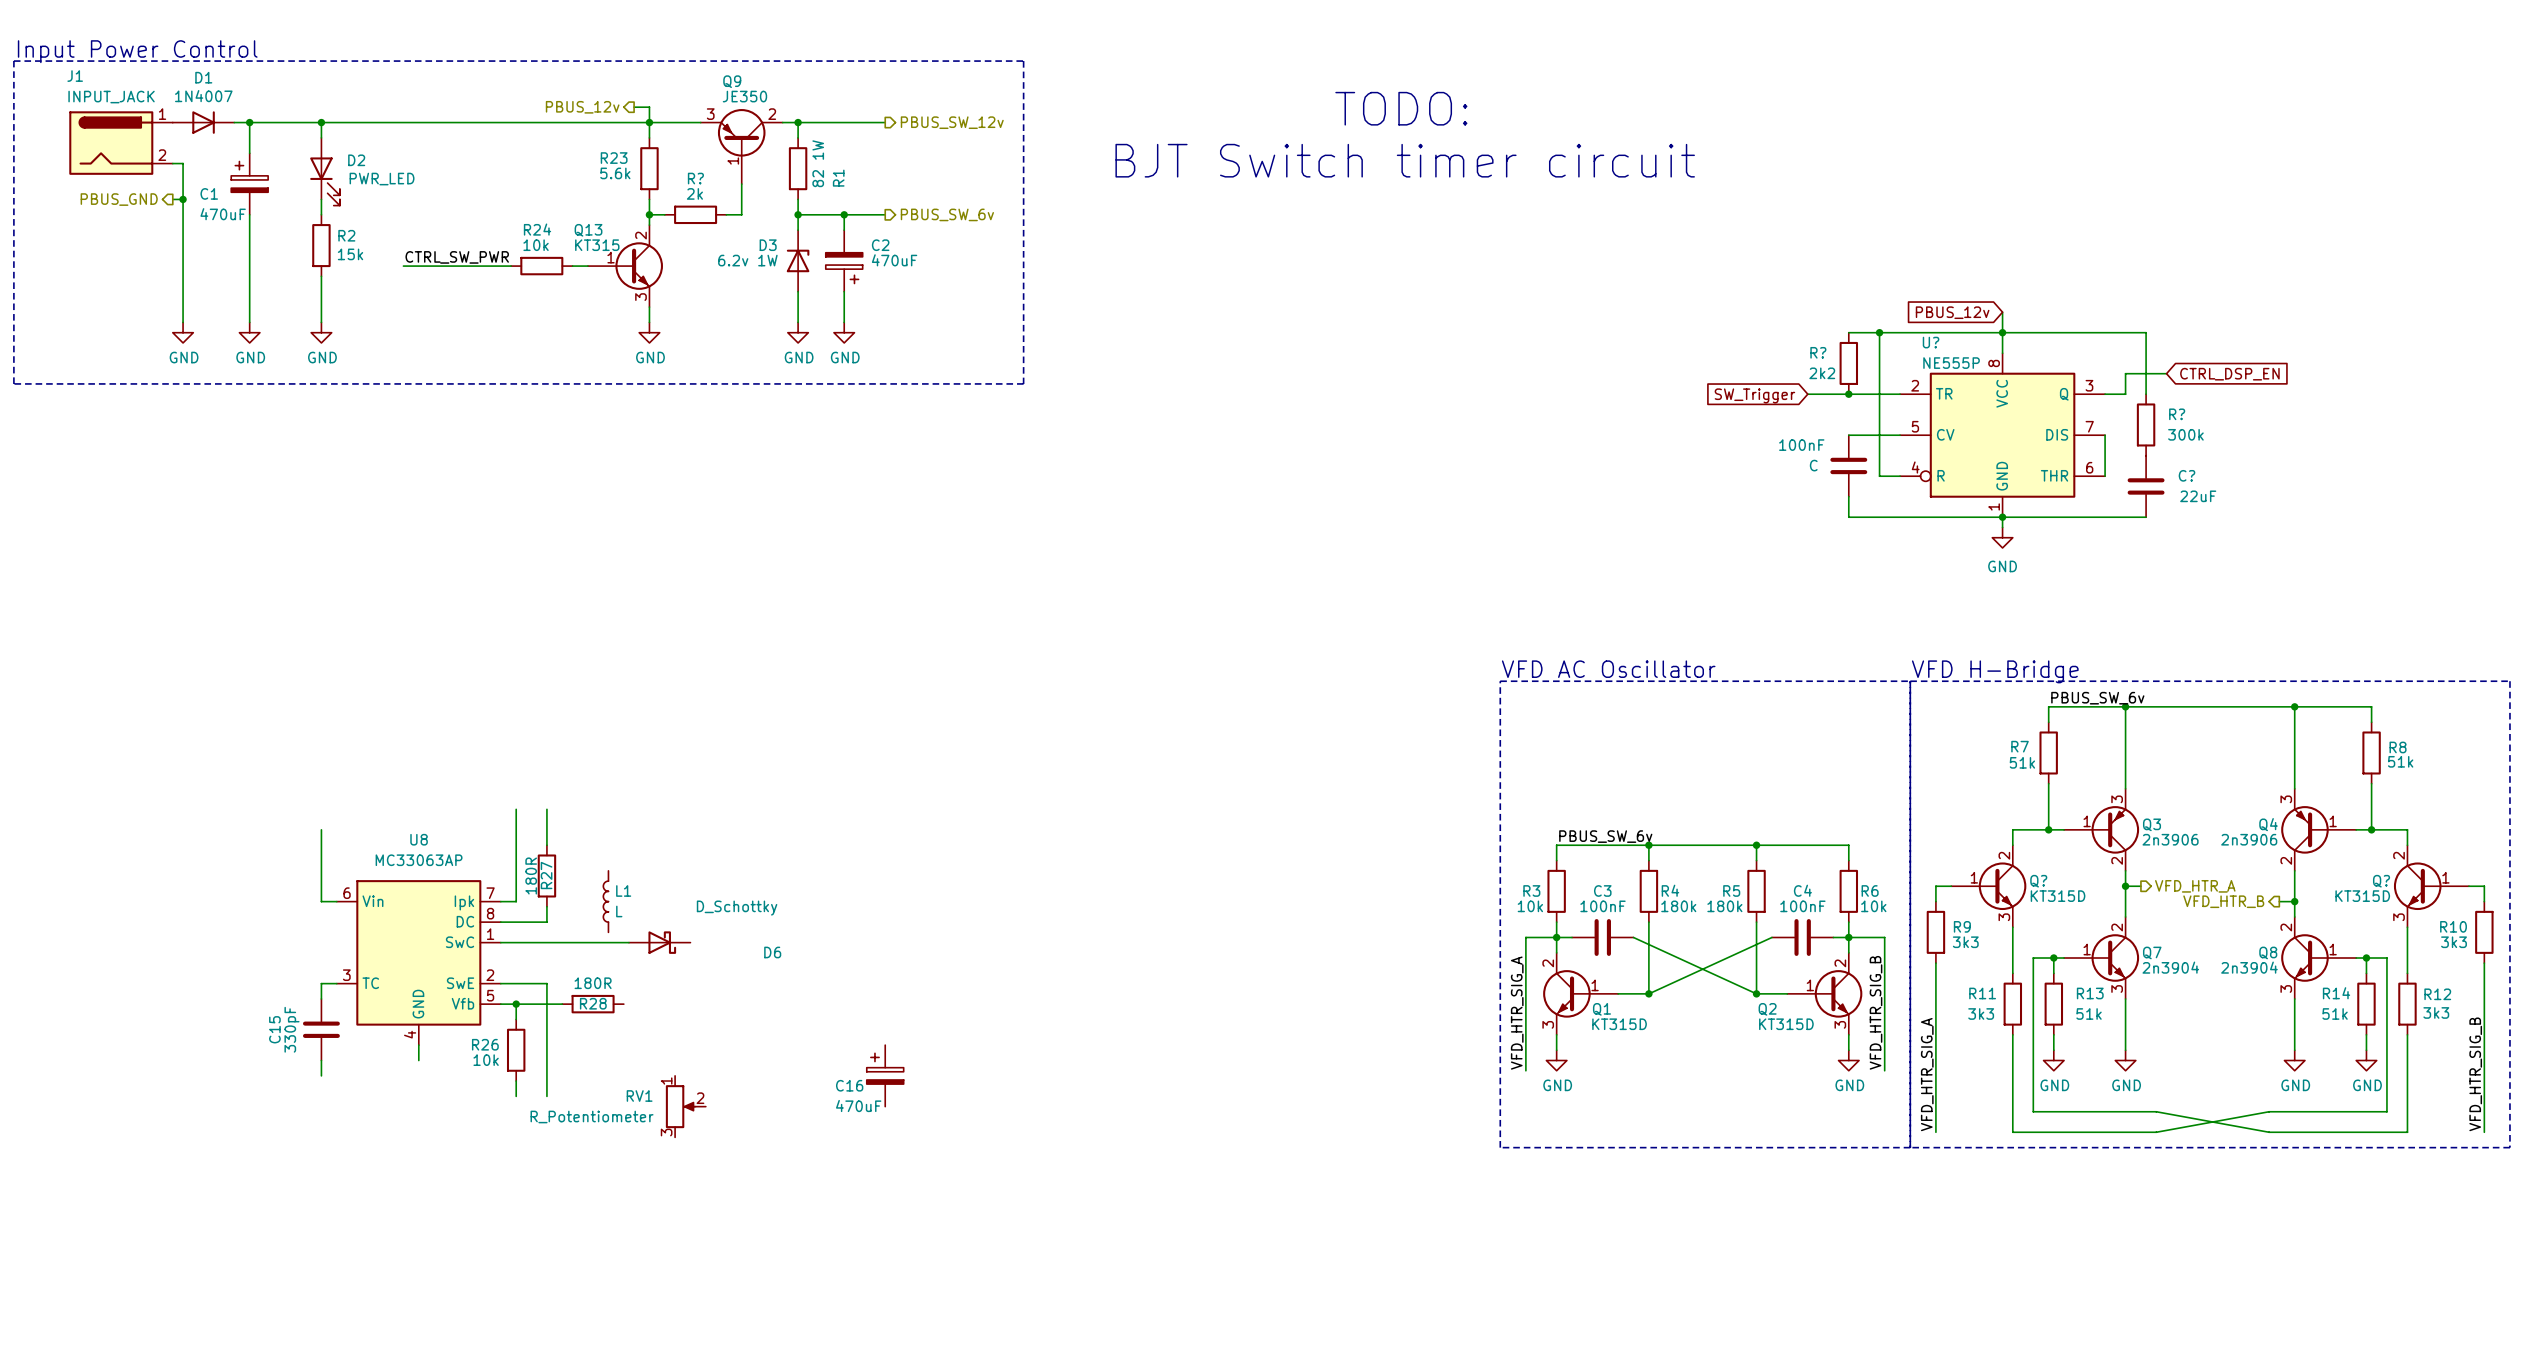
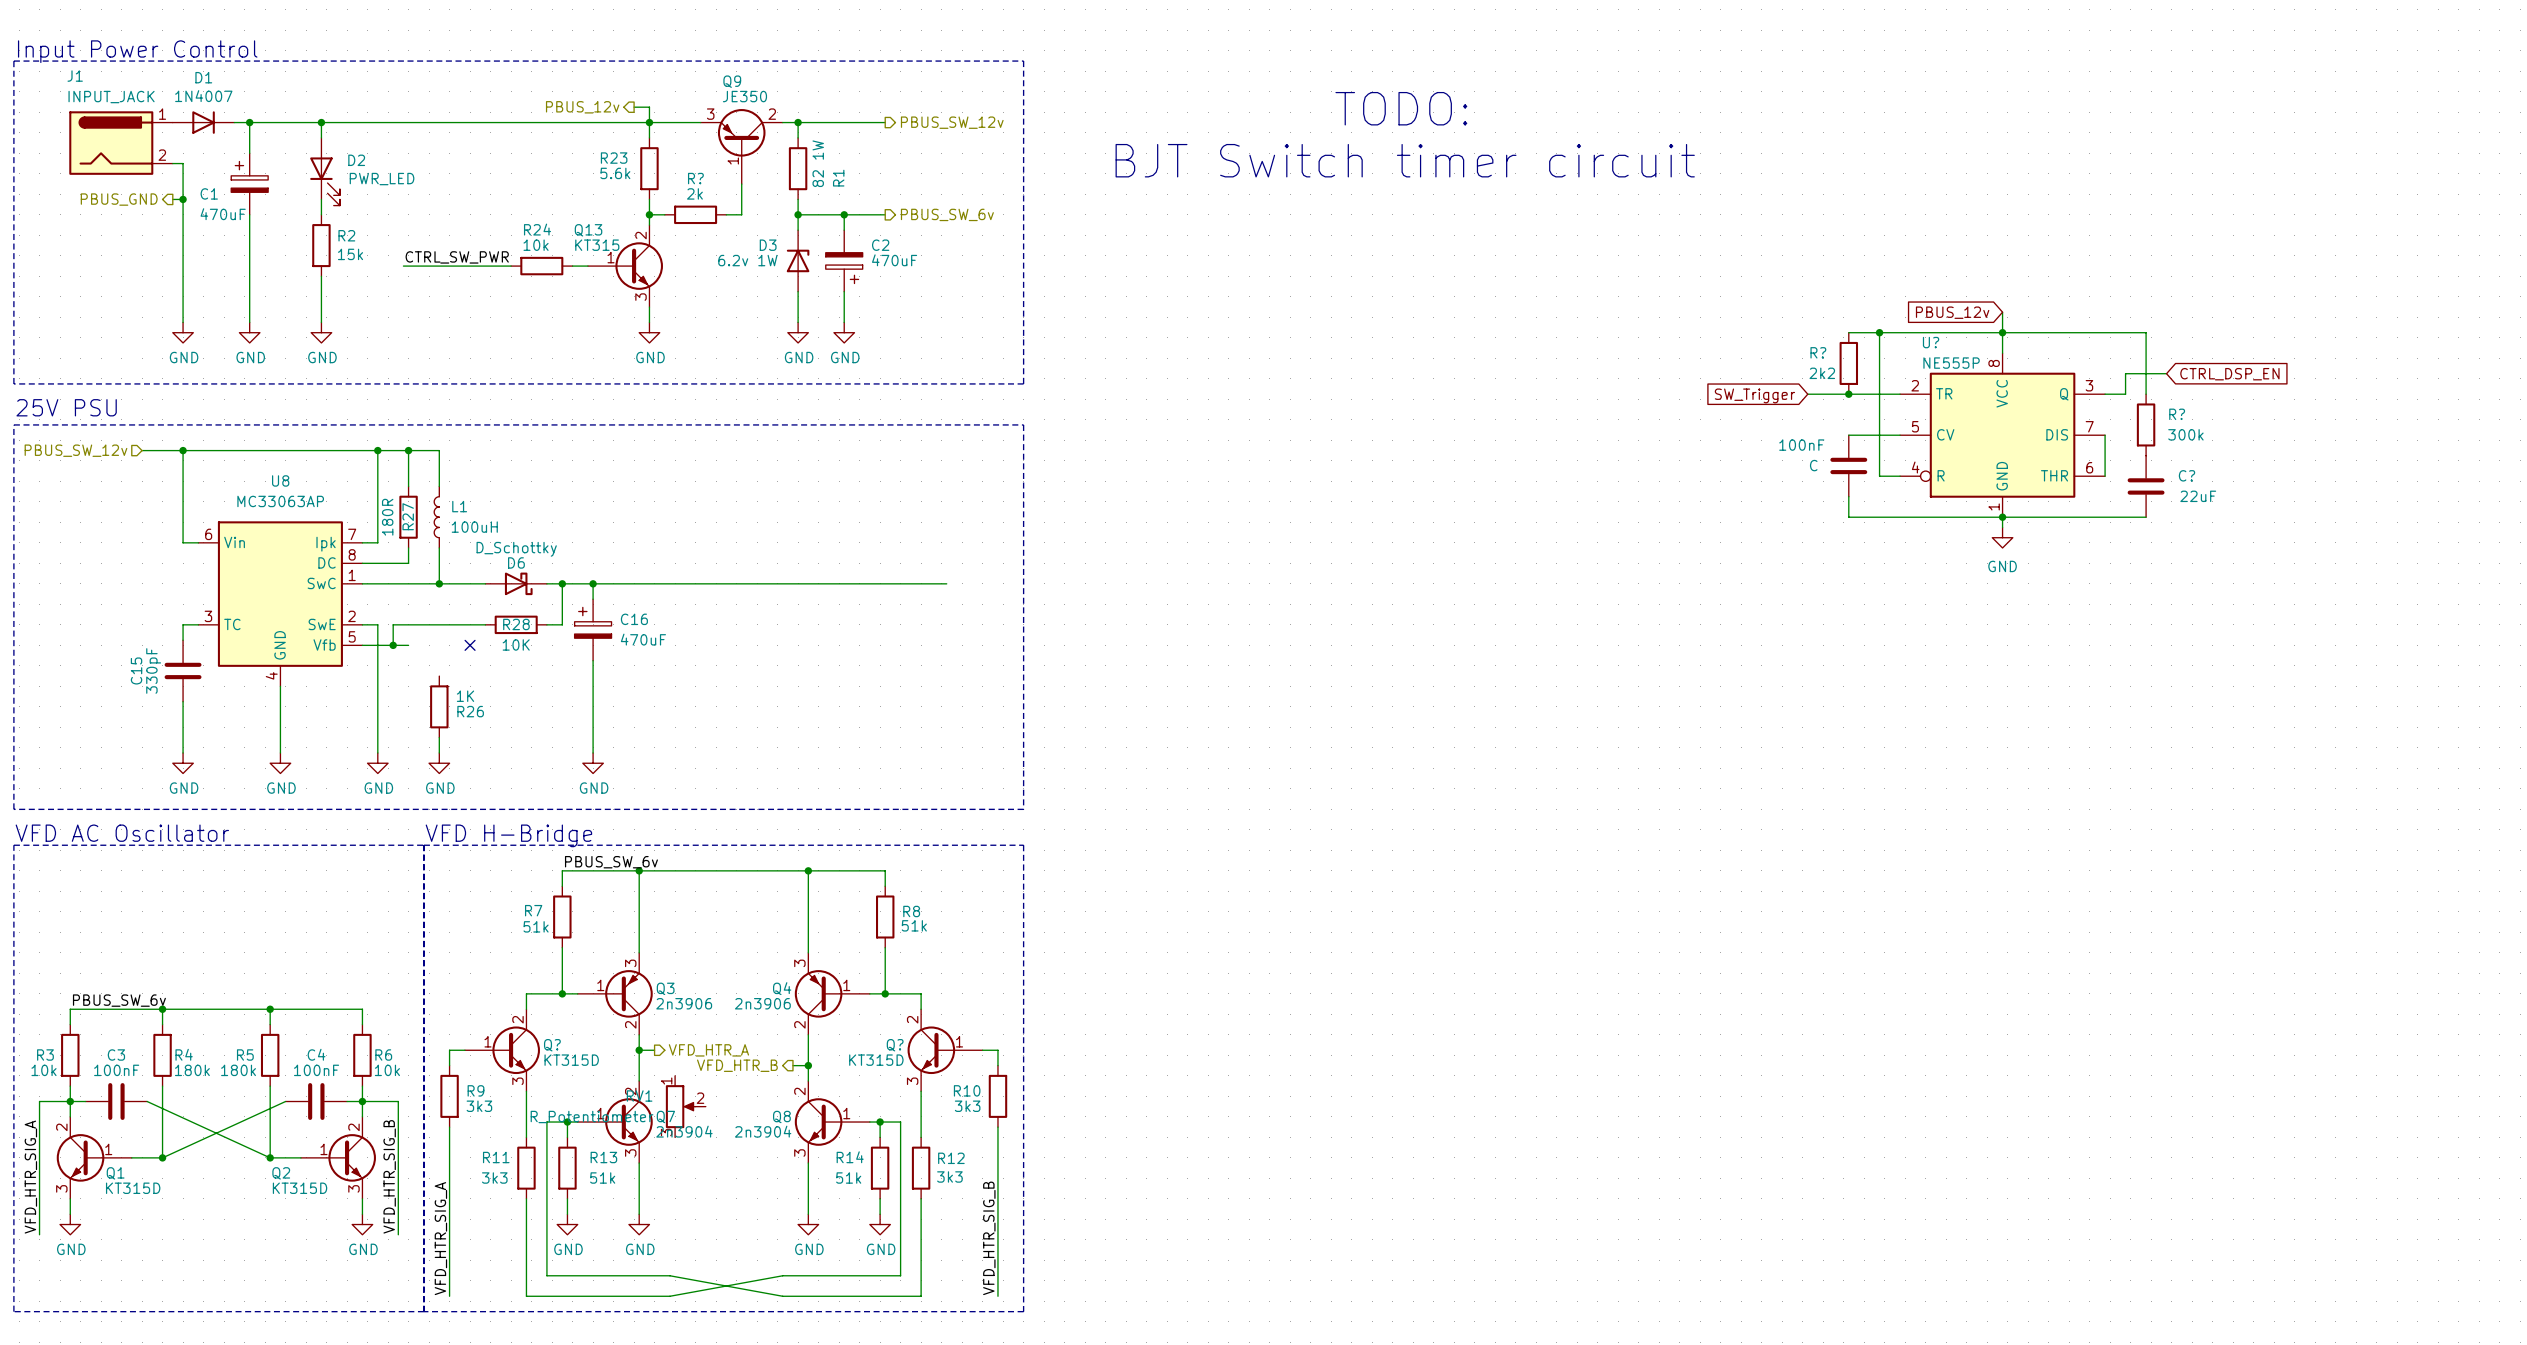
text: none -> 25V PSU (66, 407)
line: none -> (13, 424) (13, 809) (1023, 809) (1023, 424) (13, 424)
hierarchical label: none -> PBUS_SW_12v (75, 450)
wire: none -> (142, 450) (439, 450) (439, 486)
wire: none -> (183, 450) (183, 542) (198, 542)
junction: none -> (183, 450)
wire: none -> (377, 450) (377, 542) (362, 542)
junction: none -> (377, 450)
wire: none -> (408, 450) (408, 486)
junction: none -> (408, 450)
wire: none -> (408, 547) (408, 563) (362, 563)
wire: none -> (439, 547) (439, 583)
wire: none -> (362, 583) (485, 583)
junction: none -> (439, 583)
wire: none -> (546, 583) (946, 583)
wire: none -> (562, 583) (562, 624) (546, 624)
junction: none -> (562, 583)
wire: none -> (593, 583) (593, 599)
junction: none -> (593, 583)
wire: none -> (198, 624) (183, 624) (183, 640)
wire: none -> (362, 624) (377, 624) (377, 752)
wire: none -> (485, 624) (393, 624) (393, 645)
wire: none -> (362, 645) (408, 645)
junction: none -> (393, 645)
no-connect mark: none -> (470, 645)
wire: none -> (593, 660) (593, 752)
text: VFD AC Oscillator (1608, 669) -> none
text: VFD H-Bridge (1995, 671) -> none
line: (1500, 681) (2509, 681) (2509, 1147) (1500, 1147) (1500, 681) -> none
line: (1910, 681) (1910, 1147) -> none
wire: none -> (280, 686) (280, 752)
label: PBUS_SW_6v (2097, 698) -> none
wire: none -> (183, 701) (183, 752)
wire: (2125, 706) (2125, 788) -> none
junction: (2125, 706) -> none
wire: (2294, 706) (2294, 788) -> none
junction: (2294, 706) -> none
wire: (2048, 722) (2048, 706) (2371, 706) (2371, 722) -> none
wire: none -> (439, 737) (439, 752)
R7 position: (2048, 752) -> (562, 916)
R8 position: (2371, 752) -> (885, 916)
power symbol: none -> GND (183, 763)
power symbol: none -> GND (280, 763)
power symbol: none -> GND (377, 763)
power symbol: none -> GND (439, 763)
power symbol: none -> GND (593, 763)
wire: (2048, 783) (2048, 829) -> none
wire: (2371, 783) (2371, 829) -> none
wire: (516, 809) (516, 901) (500, 901) -> none
wire: (546, 809) (546, 845) -> none
wire: (321, 829) (321, 901) (336, 901) -> none
junction: (2048, 829) -> none
wire: (2064, 829) (2012, 829) (2012, 845) -> none
Q3 position: (2101, 829) -> (615, 993)
Q4 position: (2318, 829) -> (832, 993)
wire: (2356, 829) (2407, 829) (2407, 845) -> none
junction: (2371, 829) -> none
text: none -> VFD AC Oscillator (122, 833)
text: none -> VFD H-Bridge (508, 835)
label: PBUS_SW_6v (1605, 836) -> none
line: none -> (13, 845) (1023, 845) (1023, 1311) (13, 1311) (13, 845)
line: none -> (423, 845) (423, 1311)
wire: (1648, 845) (1648, 860) -> none
junction: (1648, 845) -> none
wire: (1756, 845) (1756, 860) -> none
junction: (1756, 845) -> none
wire: (1556, 860) (1556, 845) (1848, 845) (1848, 860) -> none
label: none -> PBUS_SW_6v (611, 862)
wire: none -> (639, 870) (639, 952)
junction: none -> (639, 870)
wire: none -> (808, 870) (808, 952)
junction: none -> (808, 870)
wire: (2125, 870) (2125, 916) -> none
wire: (2294, 870) (2294, 916) -> none
R27 value position: 180R (531, 875) -> 180R (387, 517)
R27 position: (546, 875) -> (408, 517)
wire: none -> (562, 886) (562, 870) (885, 870) (885, 886)
wire: (1951, 886) (1935, 886) (1935, 901) -> none
Q?: KT315D (1988, 886) -> none
wire: (2125, 886) (2140, 886) -> none
junction: (2125, 886) -> none
hierarchical label: VFD_HTR_A (2195, 886) -> none
Q?: KT315D (2431, 886) -> none
wire: (2468, 886) (2484, 886) (2484, 901) -> none
L1 name position: L1 (623, 890) -> L1 (459, 506)
R3 position: (1556, 891) -> (70, 1055)
R4 position: (1648, 891) -> (162, 1055)
R5 position: (1756, 891) -> (270, 1055)
R6 position: (1848, 891) -> (362, 1055)
L1 position: (605, 901) -> (436, 517)
hierarchical label: VFD_HTR_B (2223, 901) -> none
wire: (2279, 901) (2294, 901) -> none
junction: (2294, 901) -> none
wire: (546, 906) (546, 922) (500, 922) -> none
D6 value position: D_Schottky (737, 908) -> D_Schottky (516, 549)
L1 value: L (619, 911) -> 100uH (474, 527)
wire: (1556, 922) (1556, 952) -> none
wire: (1648, 922) (1648, 993) -> none
wire: (1756, 922) (1756, 993) -> none
wire: (1848, 922) (1848, 952) -> none
wire: (2012, 927) (2012, 973) -> none
wire: (2407, 927) (2407, 973) -> none
R9 position: (1935, 932) -> (449, 1096)
R10 position: (2484, 932) -> (997, 1096)
junction: (1556, 937) -> none
wire: (1572, 937) (1525, 937) (1525, 1070) -> none
C3 position: (1602, 937) -> (116, 1101)
wire: (1633, 937) (1756, 993) -> none
wire: (1771, 937) (1648, 993) -> none
C4 position: (1802, 937) -> (316, 1101)
wire: (1833, 937) (1884, 937) (1884, 1070) -> none
junction: (1848, 937) -> none
wire: (500, 942) (628, 942) -> none
D6 position: (659, 942) -> (516, 583)
wire: none -> (562, 947) (562, 993)
wire: none -> (885, 947) (885, 993)
D6 name position: D6 (772, 952) -> D6 (516, 562)
wire: (2053, 958) (2053, 973) -> none
junction: (2053, 958) -> none
wire: (2064, 958) (2033, 958) (2033, 1111) (2156, 1111) (2269, 1132) (2407, 1132) (2407, 1034) -> none
Q7 position: (2101, 958) -> (615, 1122)
Q8 position: (2318, 958) -> (832, 1122)
wire: (2356, 958) (2386, 958) (2386, 1111) (2269, 1111) (2156, 1132) (2012, 1132) (2012, 1034) -> none
wire: (2366, 958) (2366, 973) -> none
junction: (2366, 958) -> none
U8 position: (418, 962) -> (280, 603)
wire: (1935, 963) (1935, 1132) -> none
wire: (2484, 963) (2484, 1132) -> none
wire: (336, 983) (321, 983) (321, 999) -> (464, 1050) (449, 1050) (449, 1065)
wire: (500, 983) (546, 983) (546, 1096) -> none
R28 value: 180R (593, 983) -> 10K (516, 644)
wire: none -> (577, 993) (526, 993) (526, 1009)
wire: none -> (869, 993) (921, 993) (921, 1009)
junction: none -> (885, 993)
Q1 position: (1580, 993) -> (94, 1157)
wire: (1618, 993) (1648, 993) -> none
junction: (1648, 993) -> none
wire: (1756, 993) (1787, 993) -> none
junction: (1756, 993) -> none
Q2 position: (1824, 993) -> (338, 1157)
wire: (2125, 999) (2125, 1050) -> none
wire: (2294, 999) (2294, 1050) -> none
label: none -> PBUS_SW_6v (119, 1000)
wire: (500, 1004) (562, 1004) -> none
wire: (516, 1004) (516, 1019) -> (567, 1122) (567, 1137)
junction position: (516, 1004) -> (562, 993)
R28 position: (593, 1004) -> (516, 624)
R11 position: (2012, 1004) -> (526, 1168)
R13 position: (2053, 1004) -> (567, 1168)
R14 position: (2366, 1004) -> (880, 1168)
R12 position: (2407, 1004) -> (921, 1168)
wire: none -> (162, 1009) (162, 1024)
junction: none -> (162, 1009)
junction: none -> (270, 1009)
label: VFD_HTR_SIG_B (1876, 1012) -> none
label: VFD_HTR_SIG_A (1517, 1013) -> none
wire: none -> (70, 1024) (70, 1009) (362, 1009) (362, 1024)
C15 position: (321, 1029) -> (183, 670)
wire: none -> (639, 1034) (639, 1081)
wire: none -> (808, 1034) (808, 1081)
wire: (1556, 1034) (1556, 1050) -> none
wire: (1848, 1034) (1848, 1050) -> none
wire: (2053, 1034) (2053, 1050) -> none
wire: (2366, 1034) (2366, 1050) -> none
R26 name position: R26 (485, 1044) -> R26 (470, 711)
wire: (418, 1045) (418, 1060) -> (362, 1198) (362, 1214)
Q?: none -> KT315D (502, 1050)
R26 position: (516, 1050) -> (439, 706)
wire: none -> (639, 1050) (654, 1050)
junction: none -> (639, 1050)
hierarchical label: none -> VFD_HTR_A (708, 1050)
Q?: none -> KT315D (945, 1050)
wire: none -> (982, 1050) (997, 1050) (997, 1065)
wire: (321, 1060) (321, 1075) -> (270, 1009) (270, 1024)
R26 value: 10k (486, 1060) -> 1K (465, 696)
power symbol: GND (1556, 1060) -> none
power symbol: GND (1848, 1060) -> none
power symbol: GND (2053, 1060) -> none
power symbol: GND (2125, 1060) -> none
power symbol: GND (2294, 1060) -> none
power symbol: GND (2366, 1060) -> none
hierarchical label: none -> VFD_HTR_B (737, 1065)
wire: none -> (792, 1065) (808, 1065)
junction: none -> (808, 1065)
label: VFD_HTR_SIG_A (1927, 1074) -> none
label: VFD_HTR_SIG_B (2475, 1074) -> none
C16 position: (885, 1075) -> (593, 629)
wire: (516, 1081) (516, 1096) -> (567, 1198) (567, 1214)
C16 name position: C16 (849, 1085) -> C16 (634, 619)
wire: none -> (70, 1086) (70, 1116)
wire: none -> (162, 1086) (162, 1157)
wire: none -> (270, 1086) (270, 1157)
wire: none -> (362, 1086) (362, 1116)
wire: none -> (526, 1091) (526, 1137)
wire: none -> (921, 1091) (921, 1137)
junction: none -> (70, 1101)
wire: none -> (85, 1101) (39, 1101) (39, 1234)
wire: none -> (147, 1101) (270, 1157)
wire: none -> (285, 1101) (162, 1157)
wire: none -> (347, 1101) (398, 1101) (398, 1234)
junction: none -> (362, 1101)
C16 value position: 470uF (858, 1106) -> 470uF (643, 639)
junction: none -> (567, 1122)
wire: none -> (577, 1122) (546, 1122) (546, 1275) (669, 1275) (782, 1296) (921, 1296) (921, 1198)
wire: none -> (869, 1122) (900, 1122) (900, 1275) (782, 1275) (669, 1296) (526, 1296) (526, 1198)
wire: none -> (880, 1122) (880, 1137)
junction: none -> (880, 1122)
wire: none -> (449, 1127) (449, 1296)
wire: none -> (997, 1127) (997, 1296)
wire: none -> (131, 1157) (162, 1157)
junction: none -> (162, 1157)
wire: none -> (270, 1157) (300, 1157)
junction: none -> (270, 1157)
wire: none -> (639, 1163) (639, 1214)
wire: none -> (808, 1163) (808, 1214)
label: none -> VFD_HTR_SIG_B (389, 1176)
label: none -> VFD_HTR_SIG_A (30, 1177)
wire: none -> (70, 1198) (70, 1214)
wire: none -> (880, 1198) (880, 1214)
power symbol: none -> GND (70, 1224)
power symbol: none -> GND (362, 1224)
power symbol: none -> GND (567, 1224)
power symbol: none -> GND (639, 1224)
power symbol: none -> GND (808, 1224)
power symbol: none -> GND (880, 1224)
label: none -> VFD_HTR_SIG_A (440, 1238)
label: none -> VFD_HTR_SIG_B (989, 1238)

